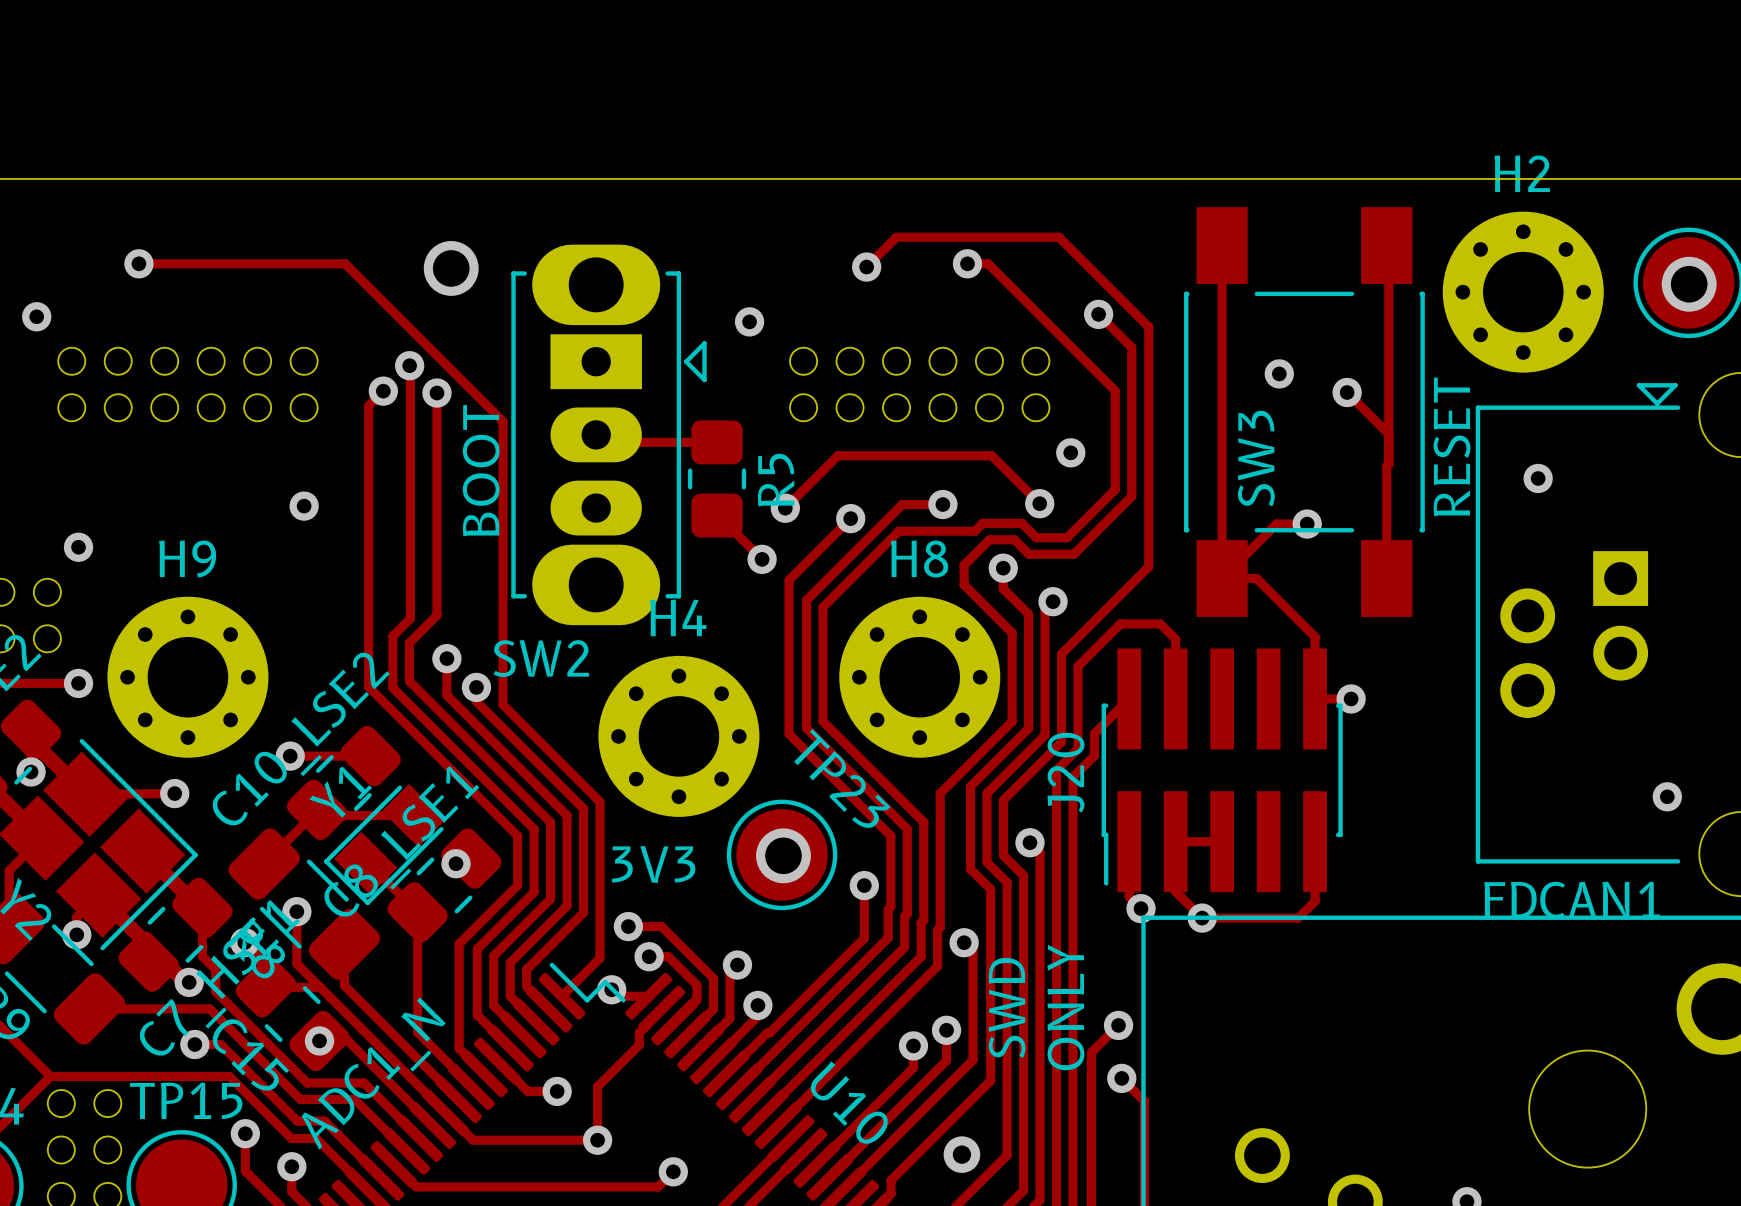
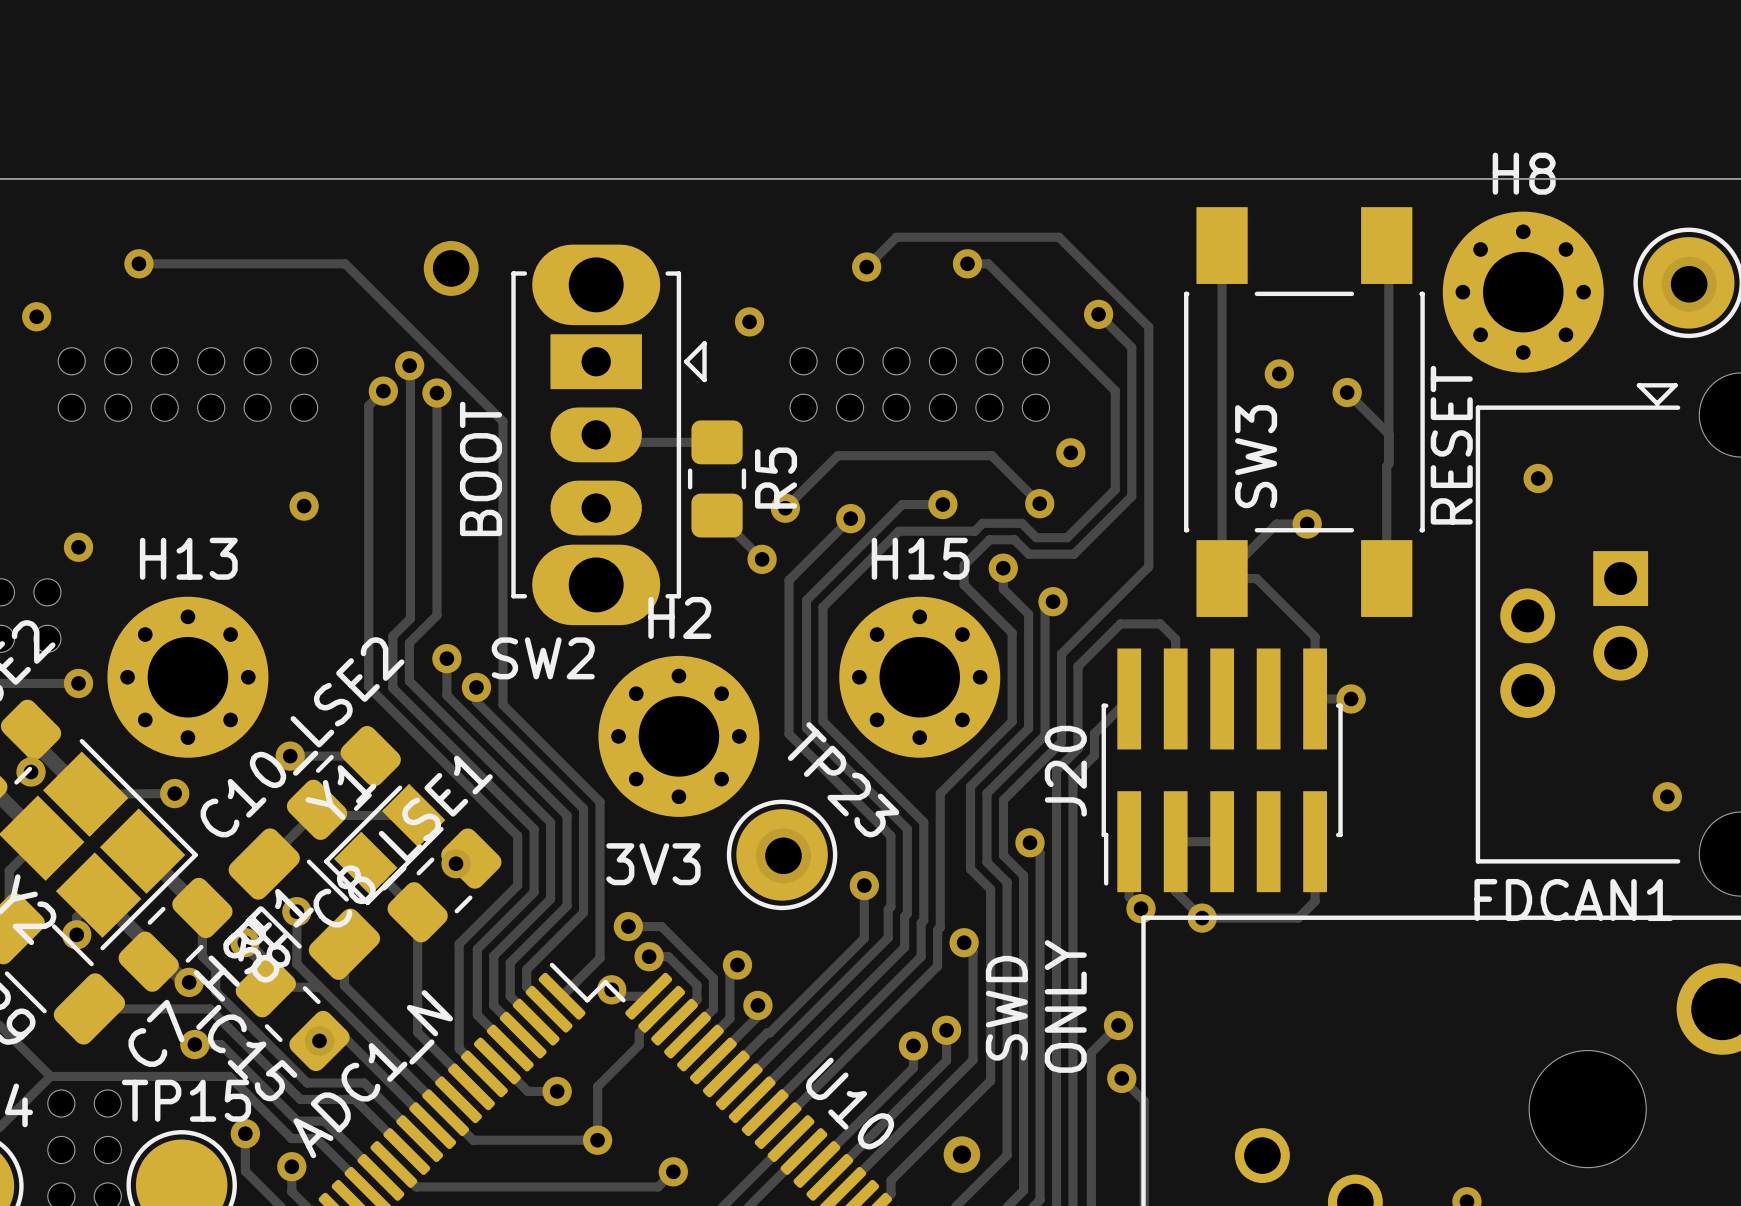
H2 name: H2 (1522, 173) -> H8 (1524, 173)
H9 name: H9 (187, 558) -> H13 (188, 558)
H8 name: H8 (919, 558) -> H15 (920, 558)
H4 name: H4 (678, 617) -> H2 (679, 617)

